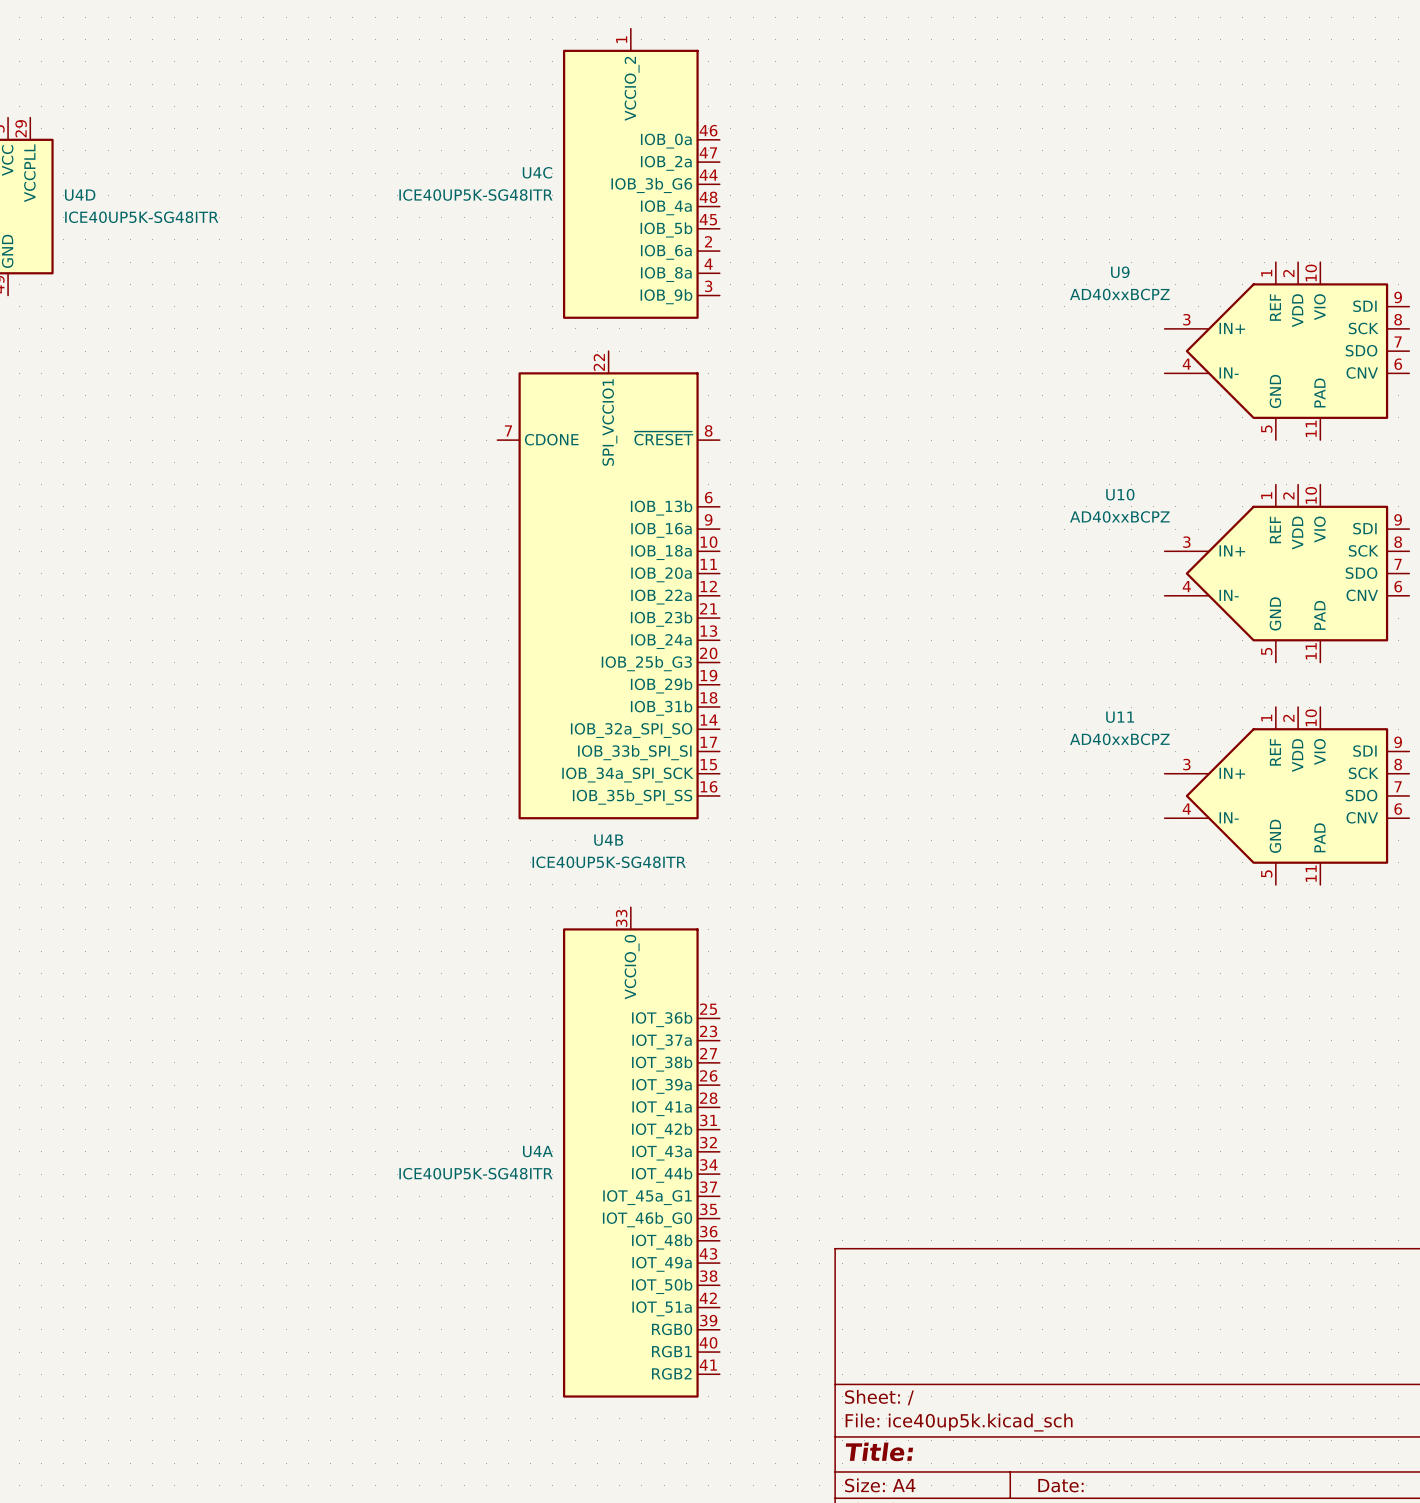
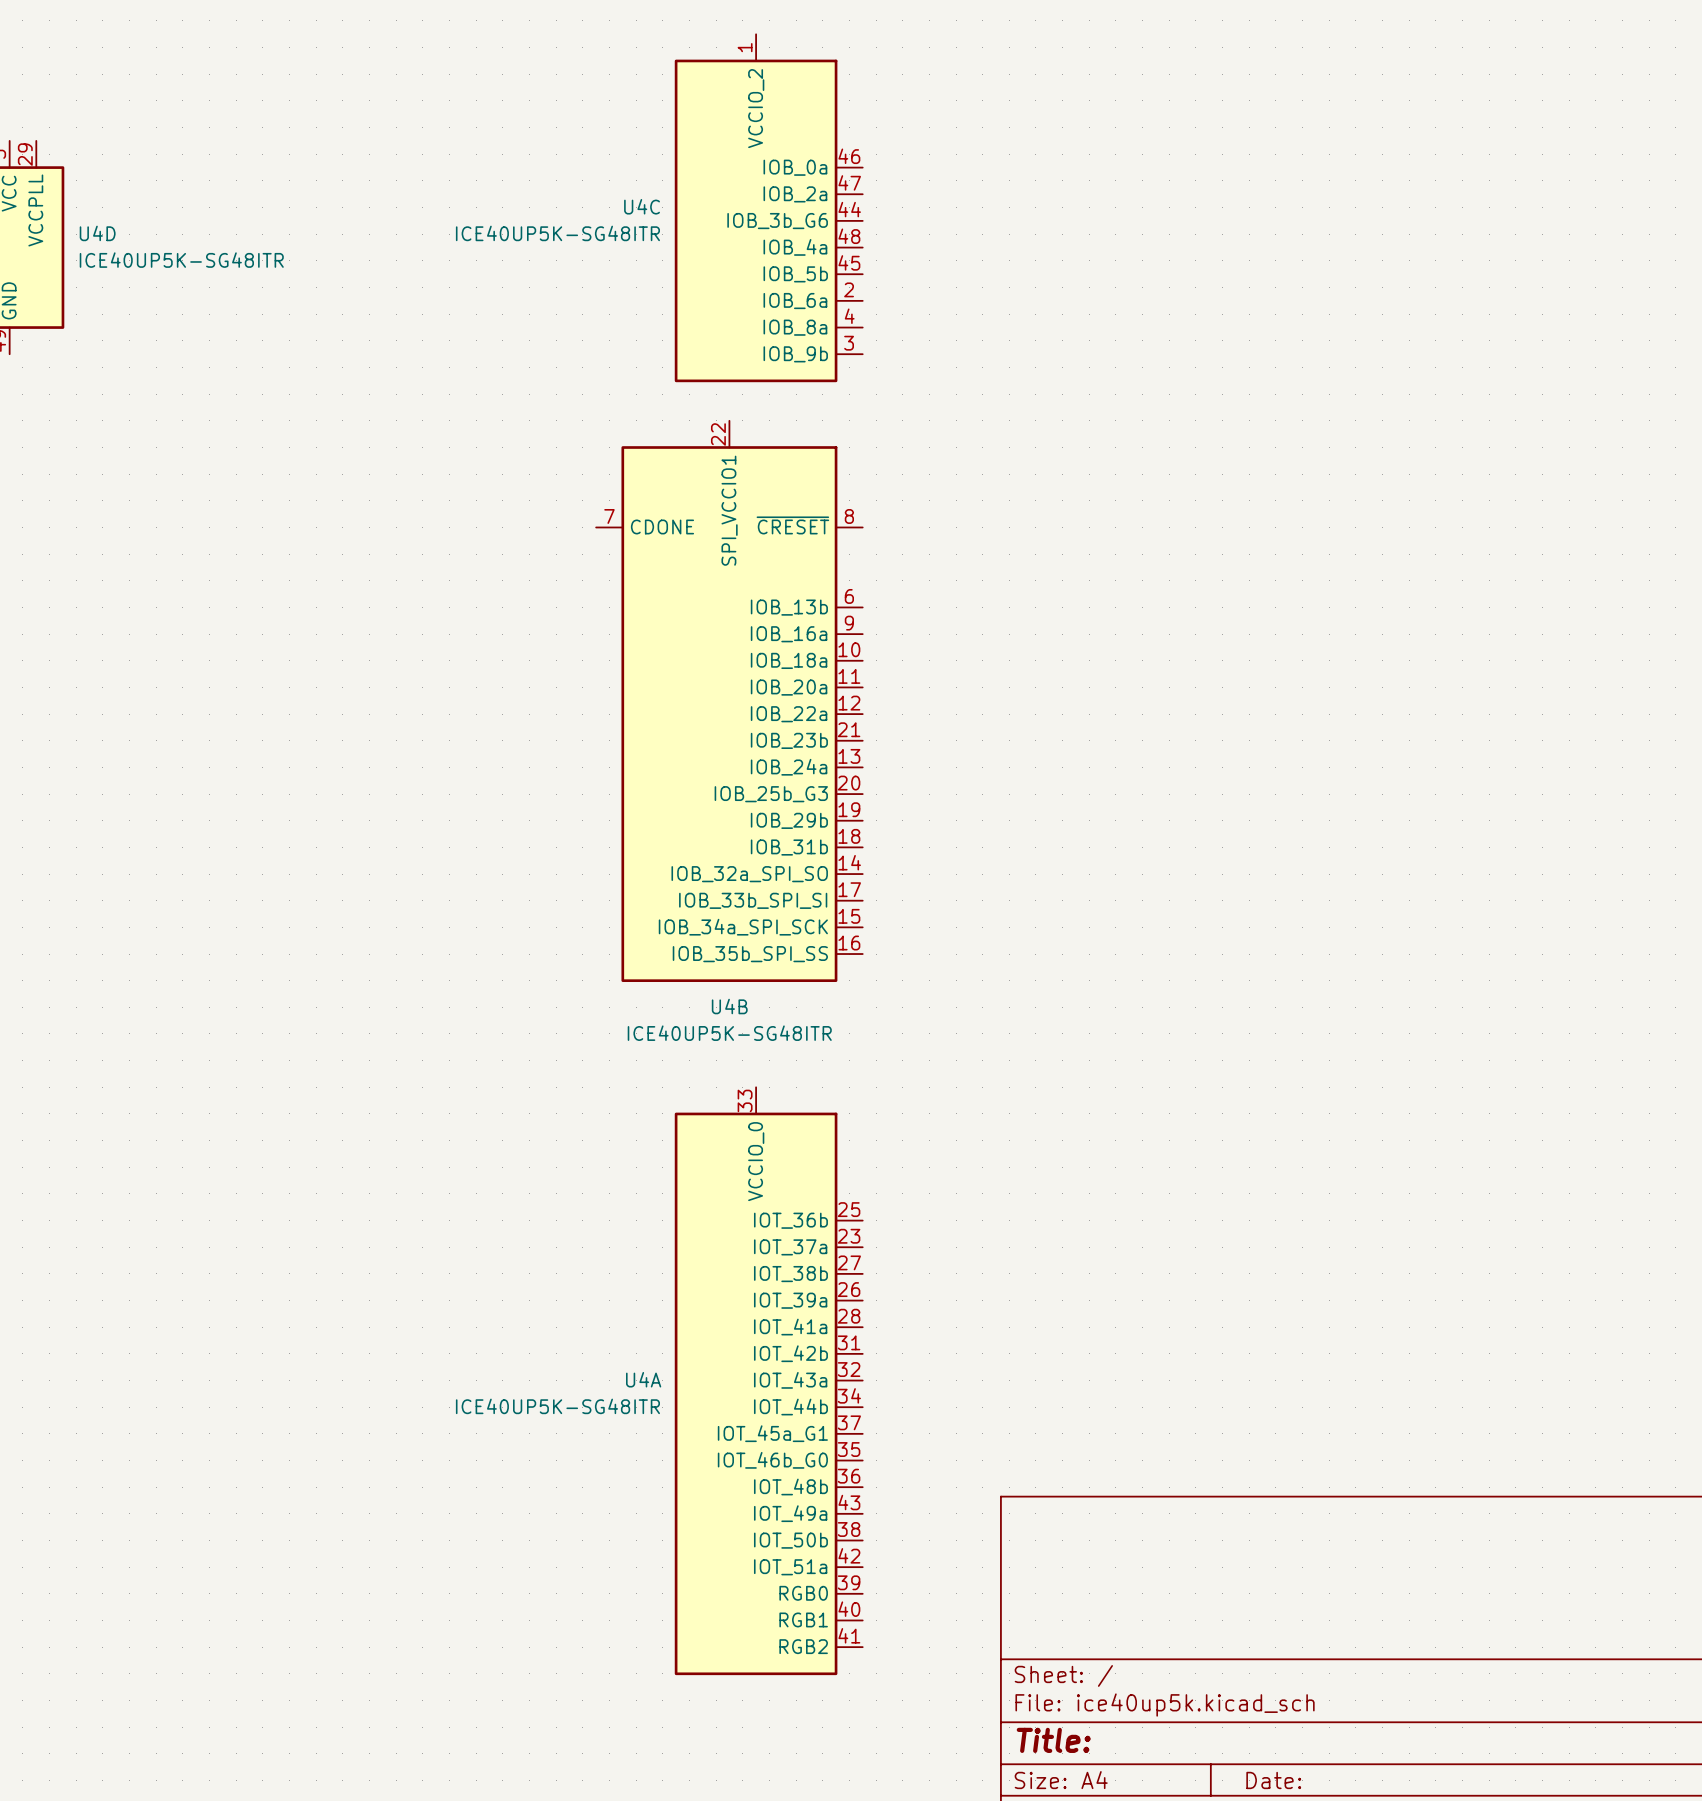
U9: AD40xxBCPZ (1286, 351) -> none
U10: AD40xxBCPZ (1286, 573) -> none
U11: AD40xxBCPZ (1286, 795) -> none

